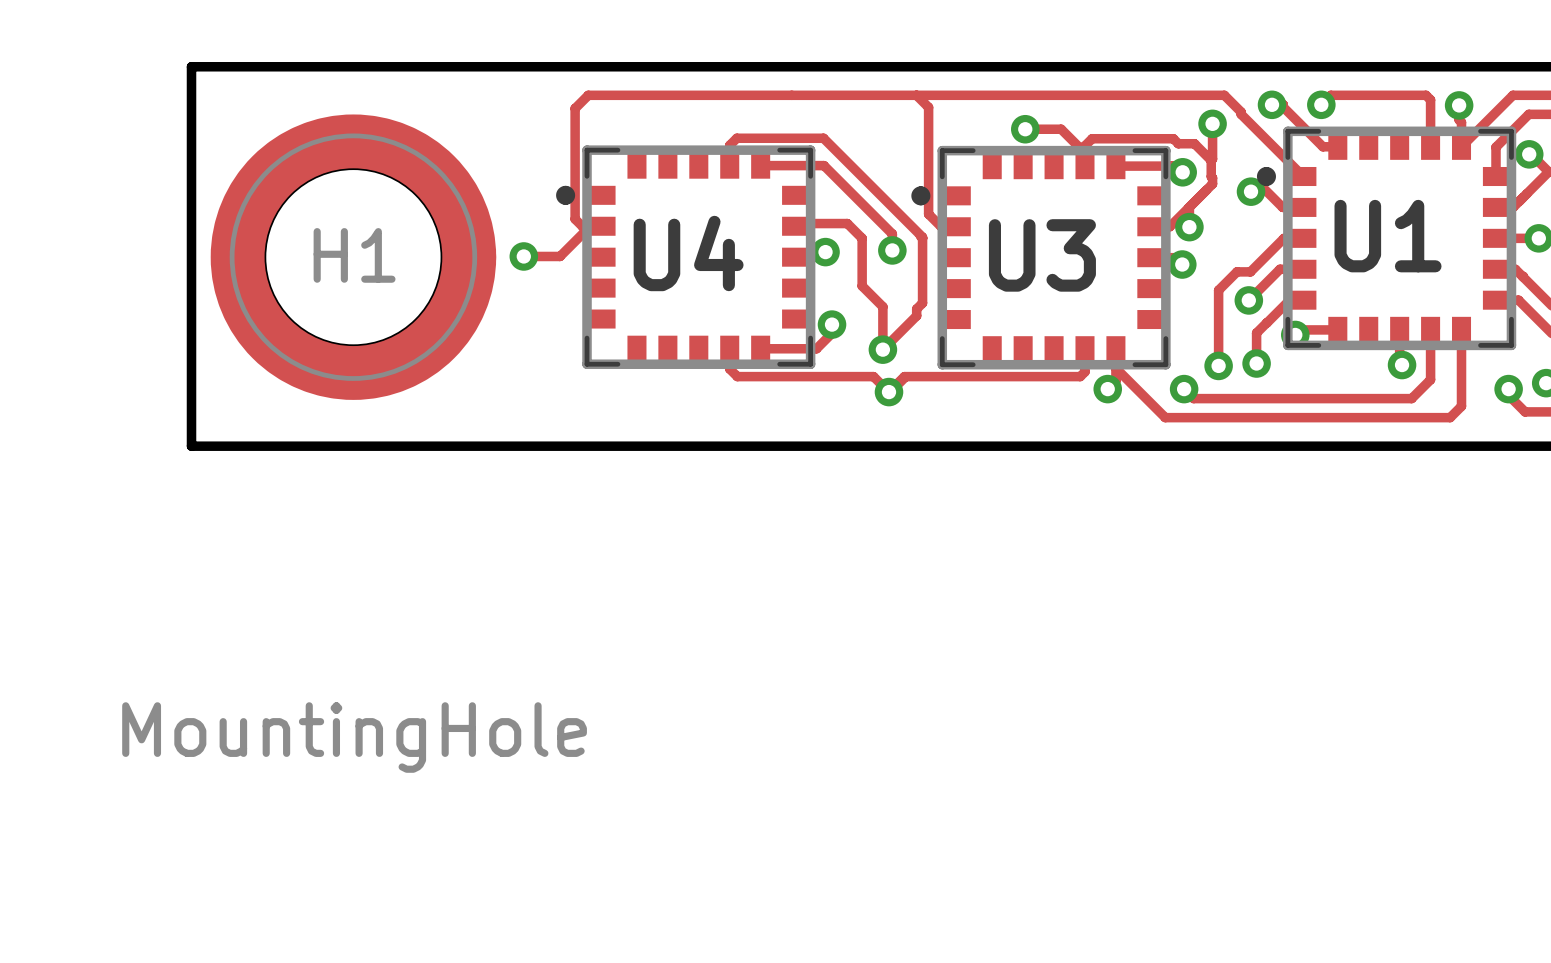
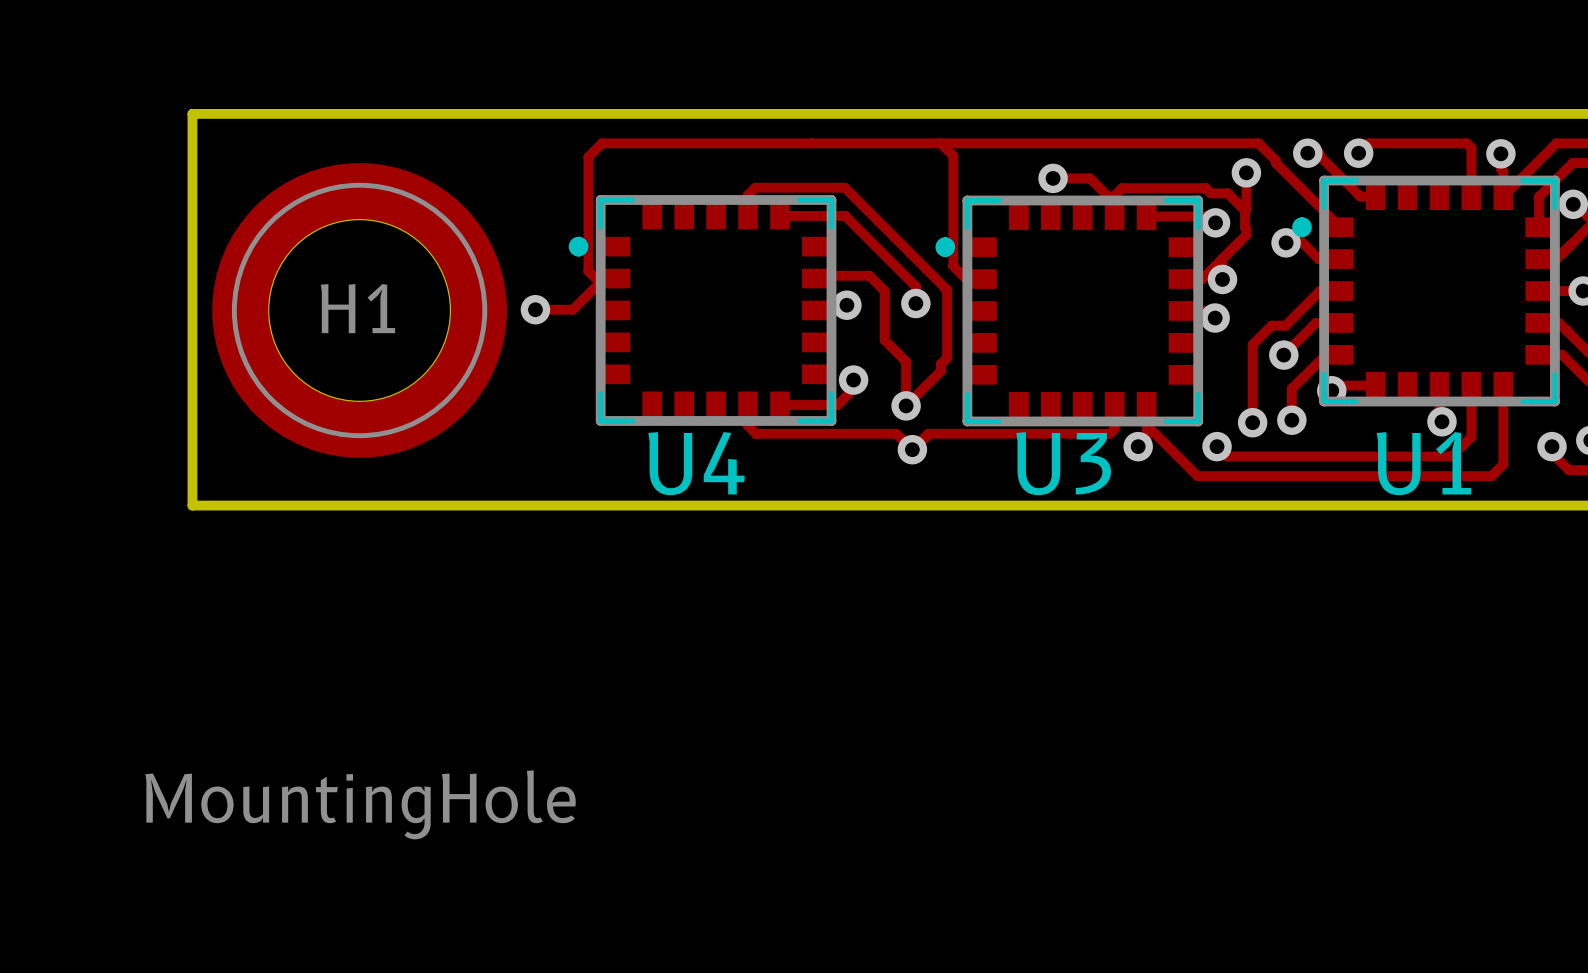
U1 name position: U1 (1388, 236) -> U1 (1423, 463)
U4 name position: U4 (688, 253) -> U4 (696, 463)
U3 name position: U3 (1042, 255) -> U3 (1063, 463)

